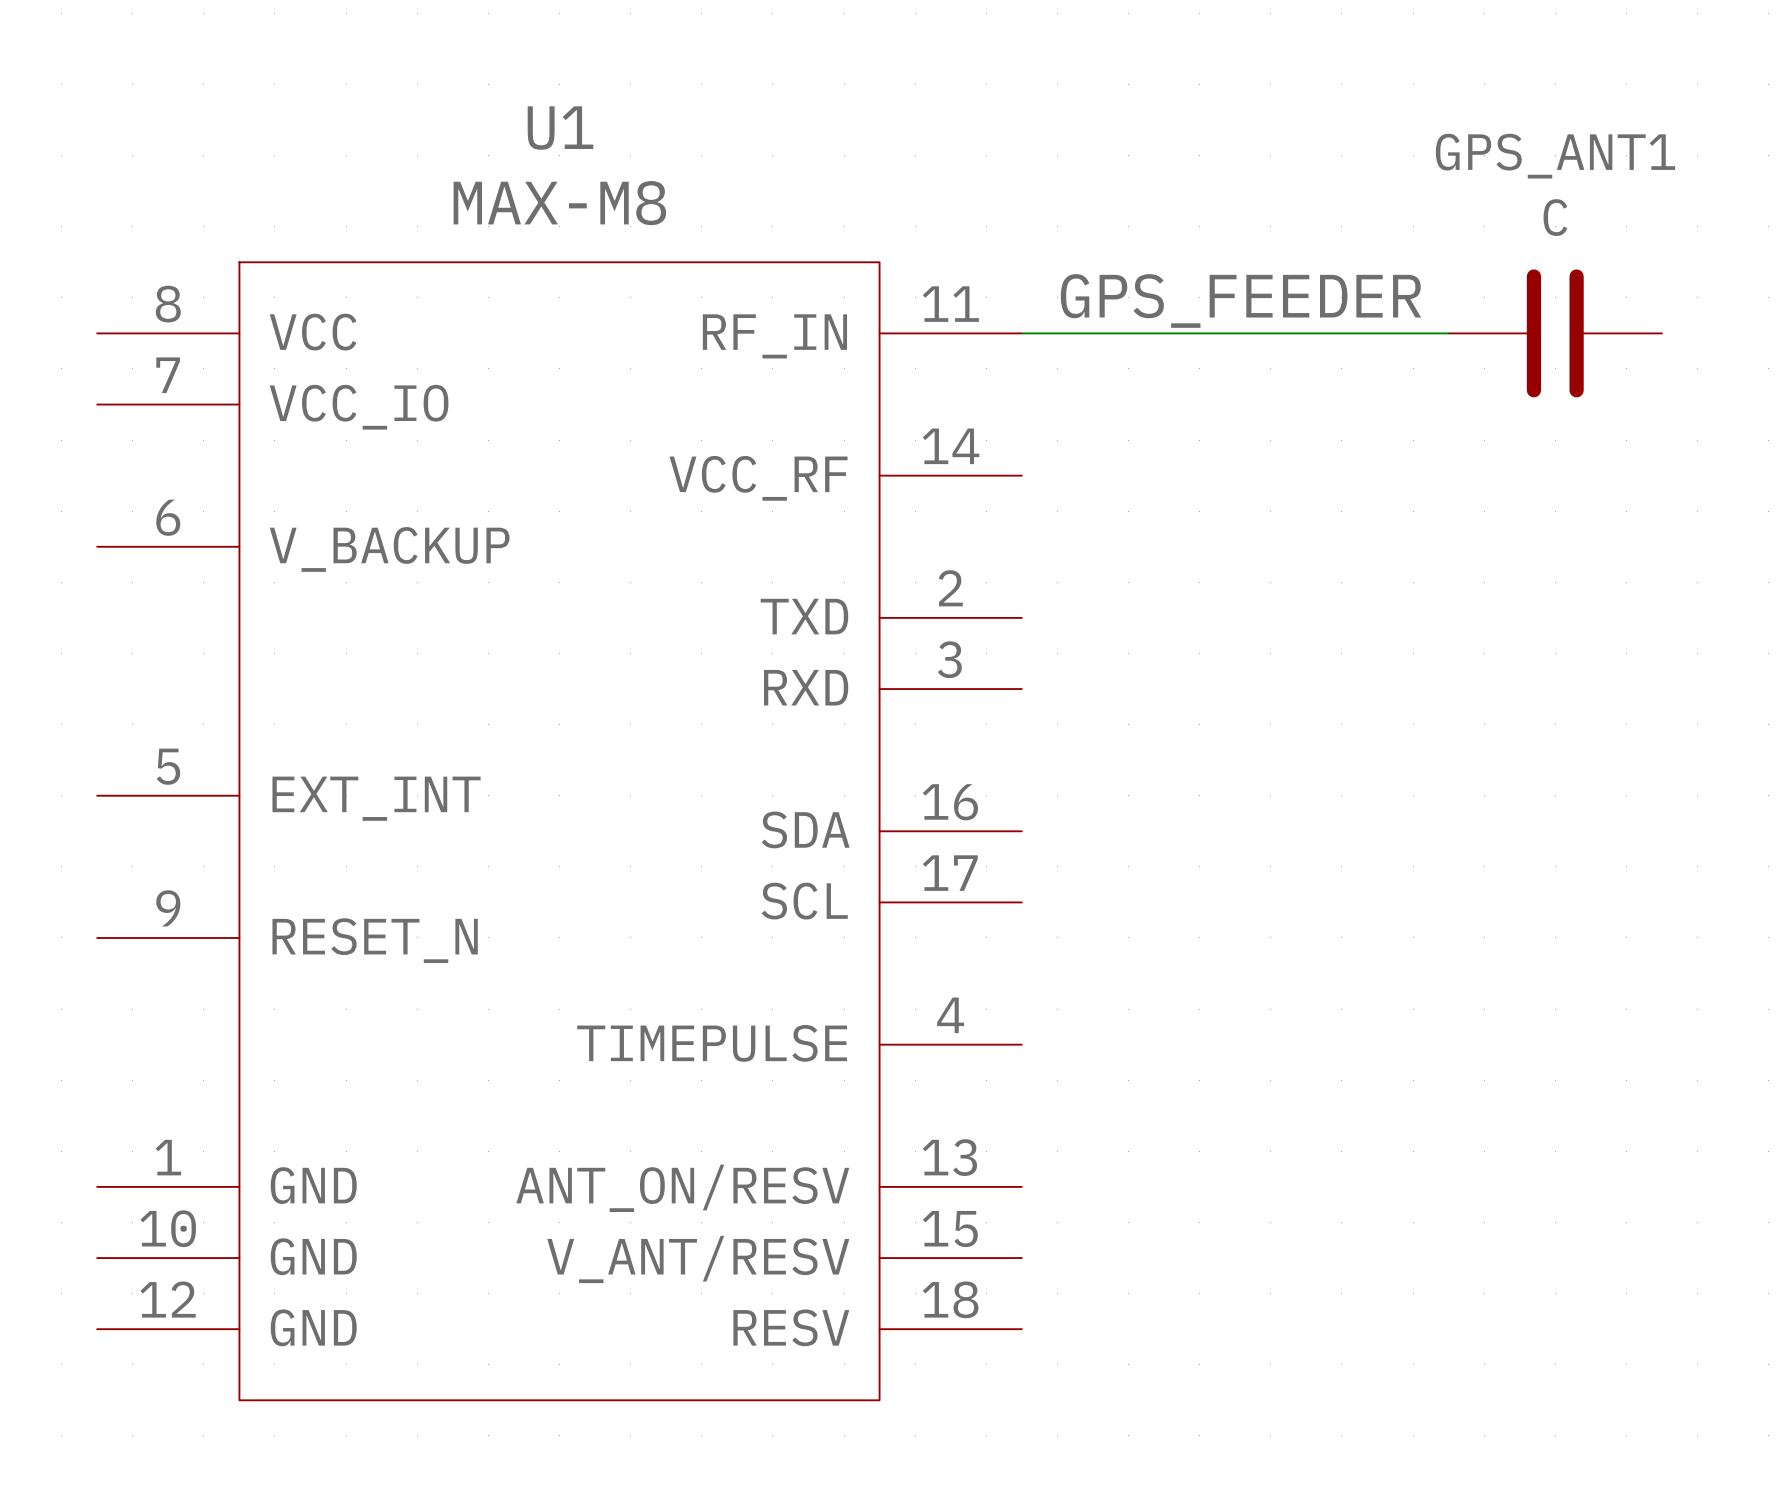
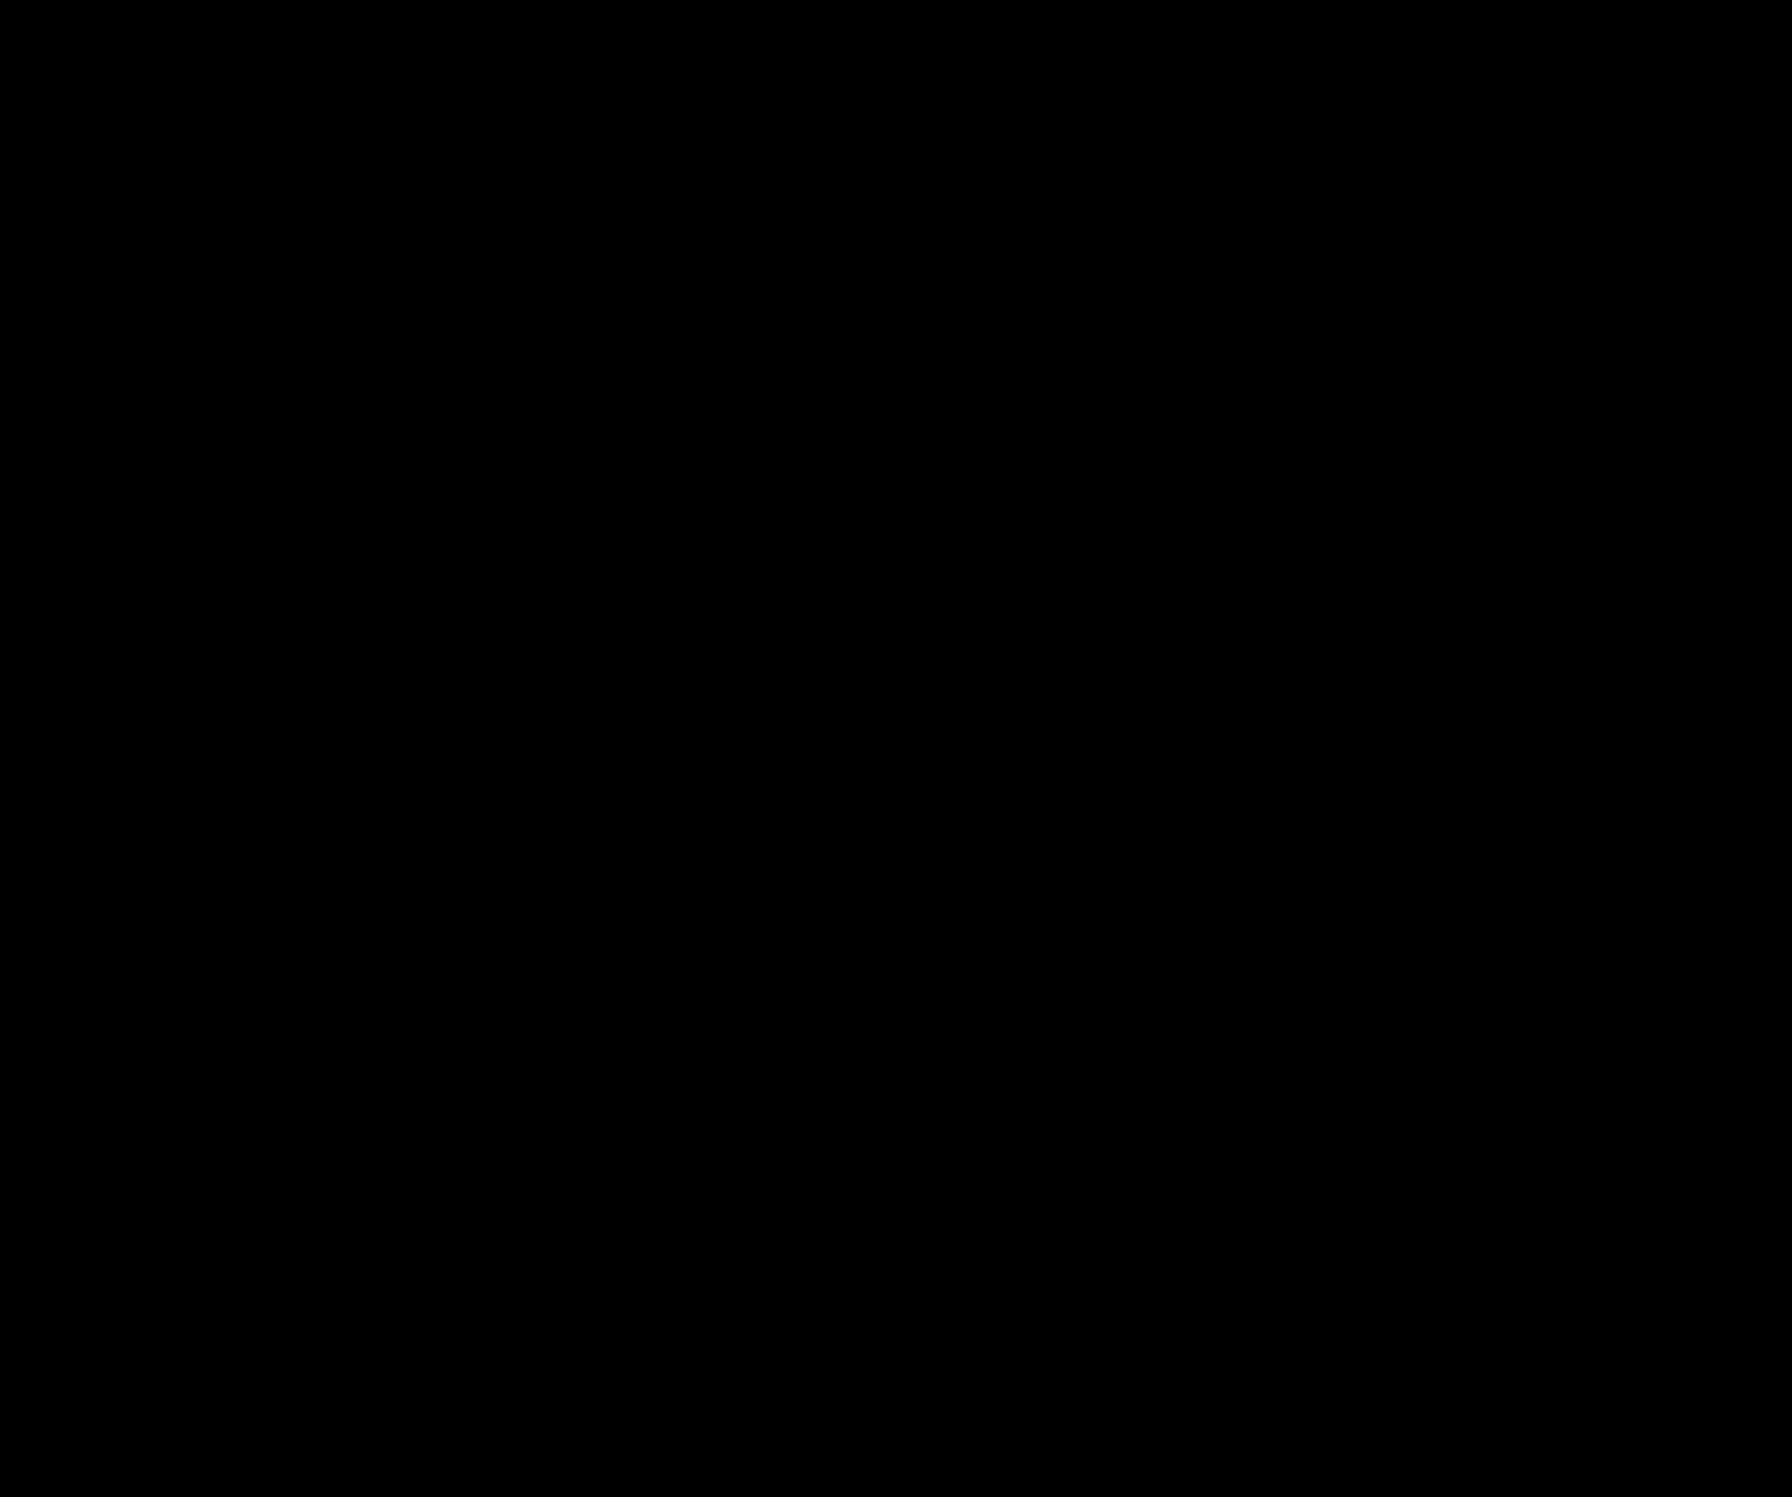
label: GPS_FEEDER (1240, 300) -> none
wire: (1021, 333) (1448, 333) -> none
GPS_ANT1: C (1555, 333) -> none
U1: MAX-M8 (559, 831) -> none

